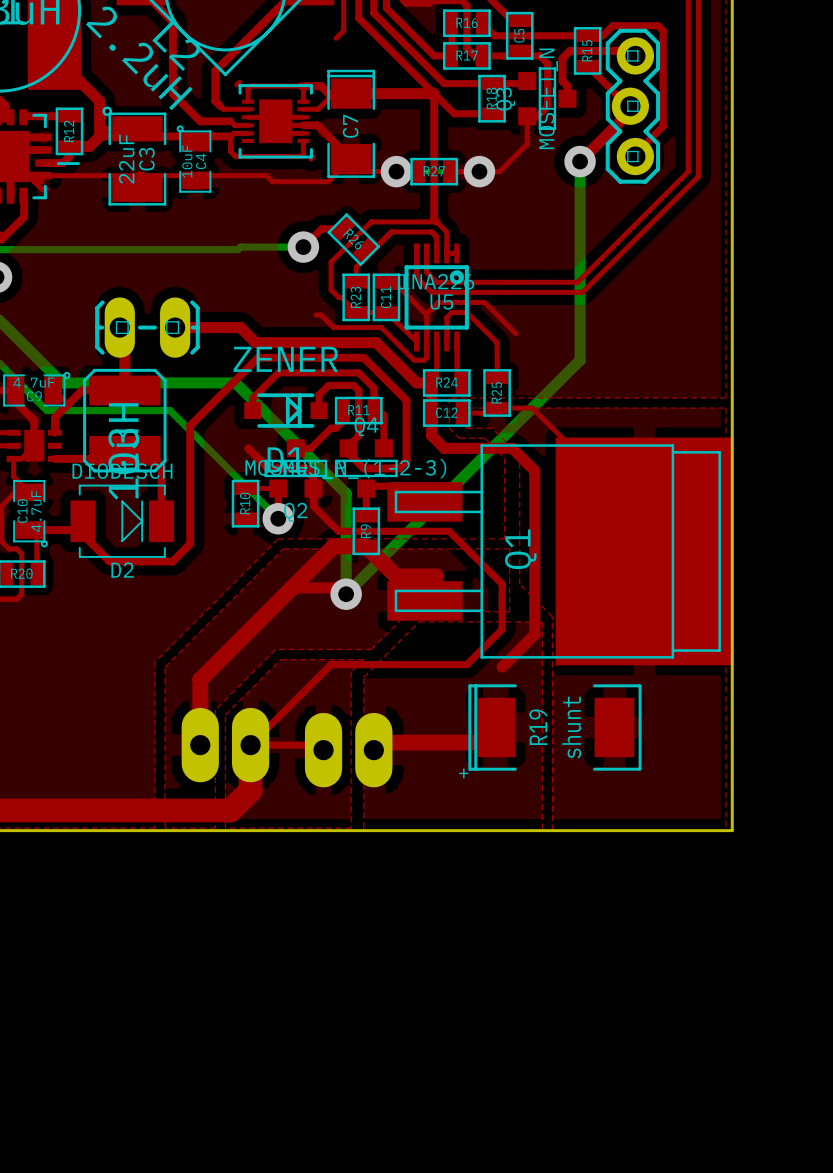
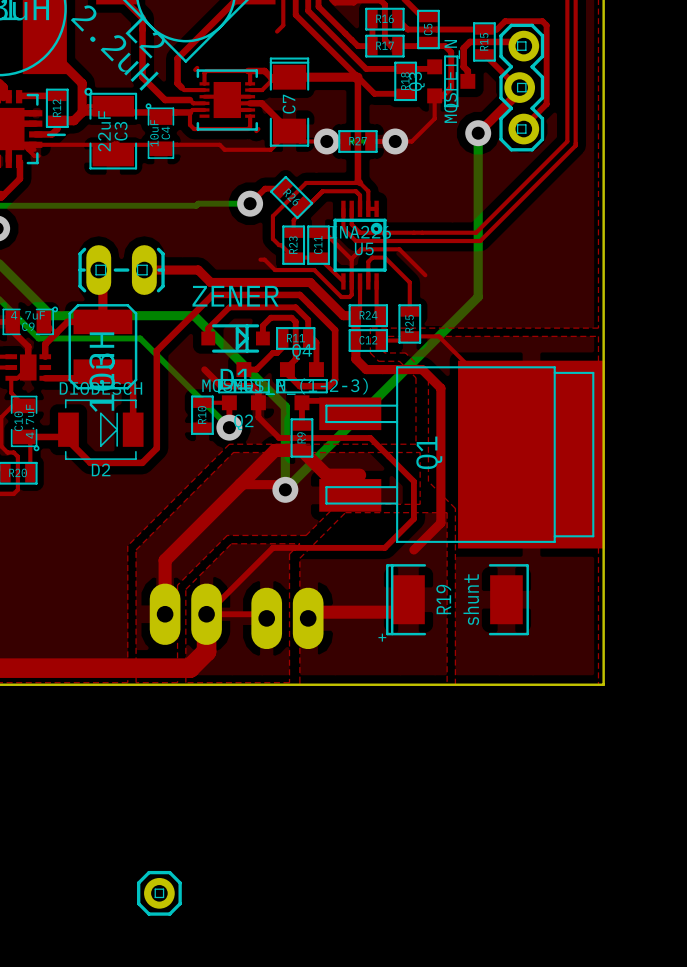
part: none -> (159, 893)

